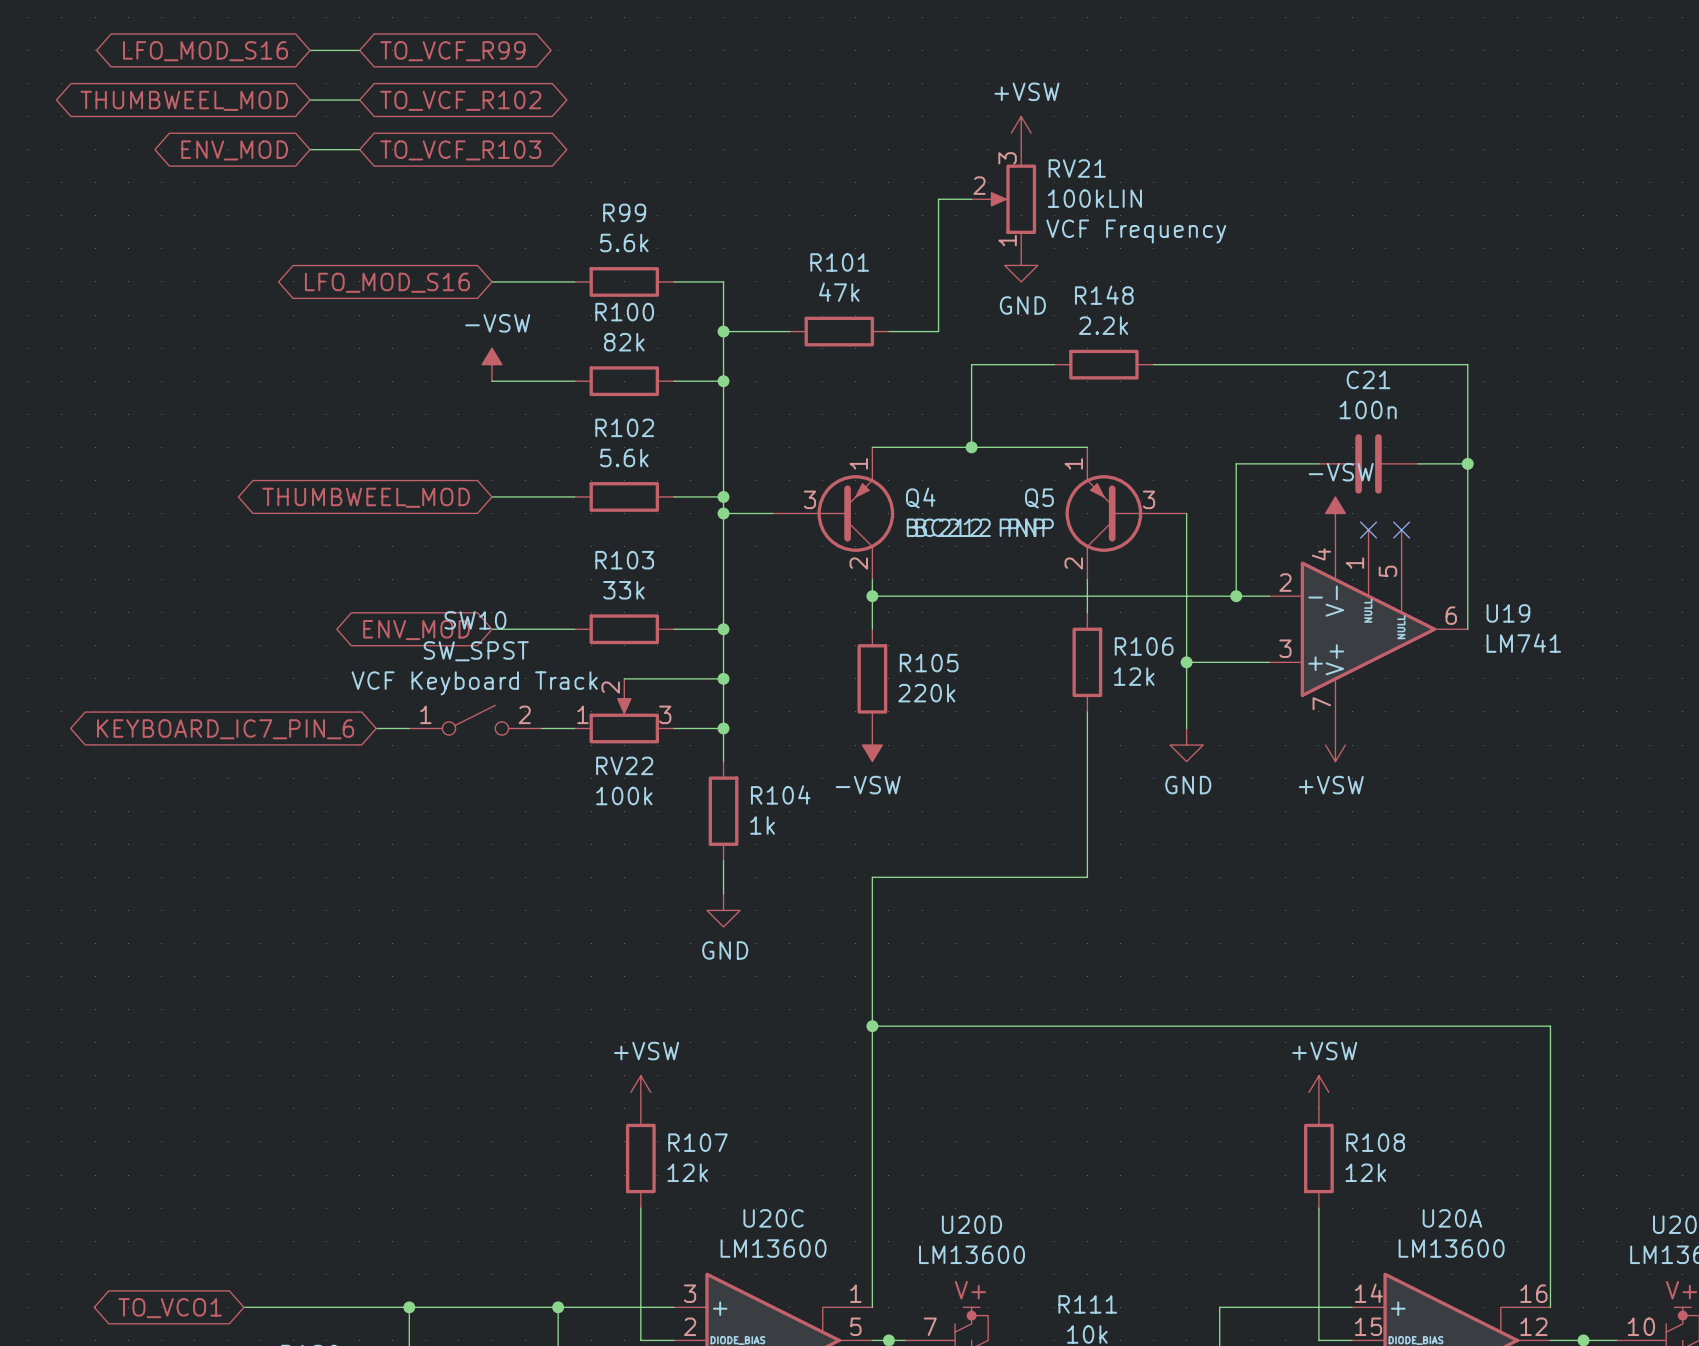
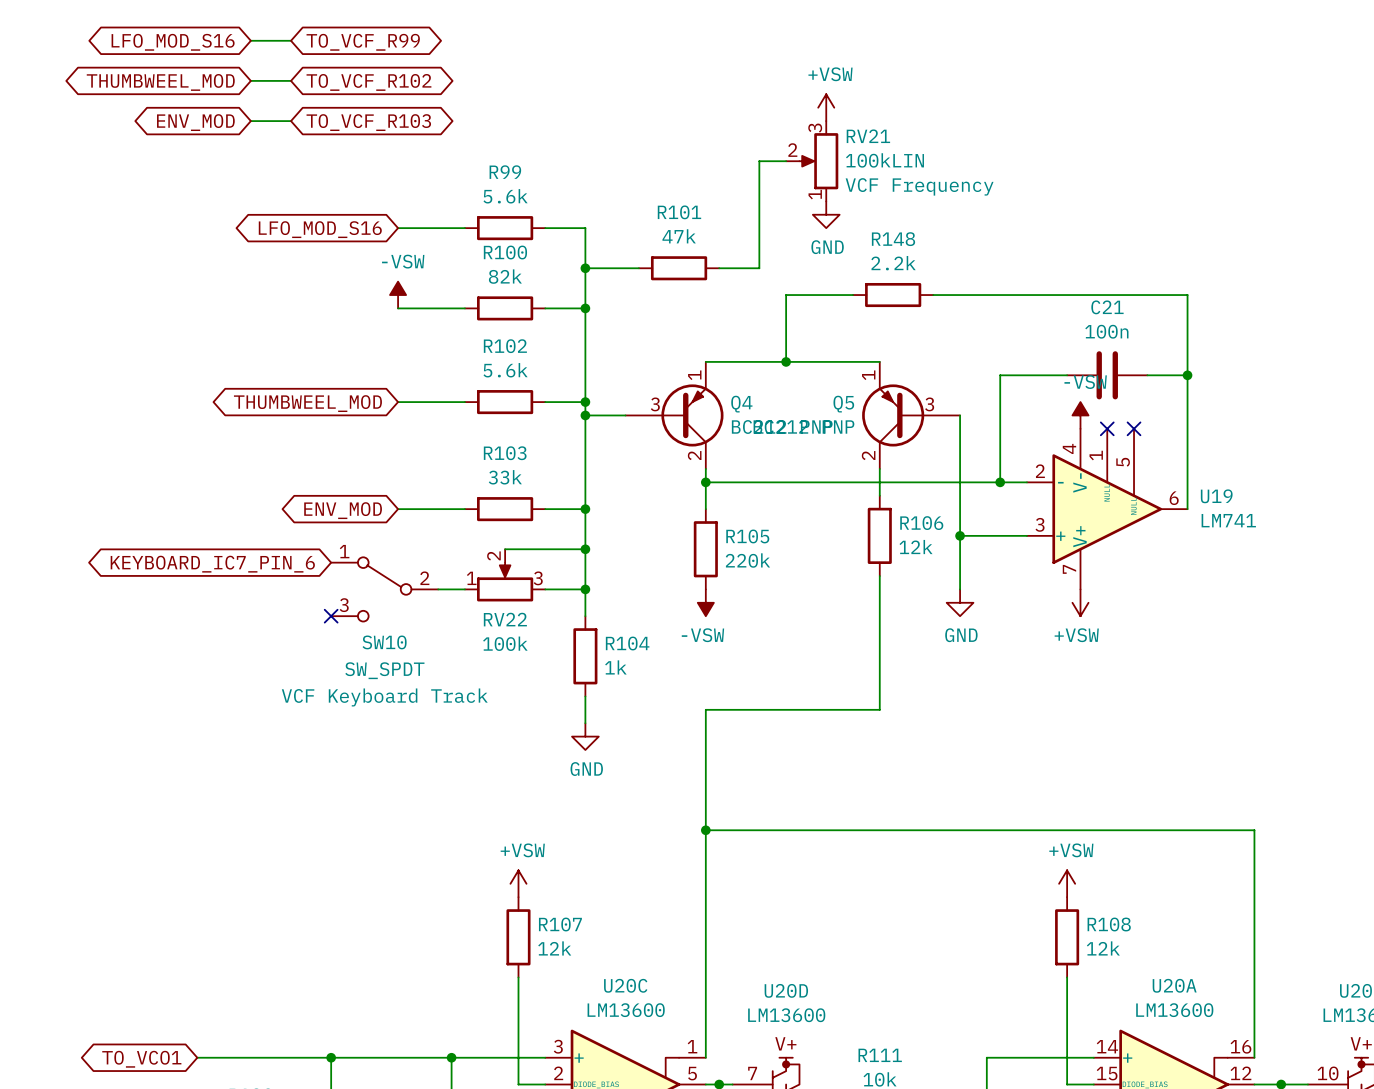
SW10 name position: SW10 (475, 620) -> SW10 (384, 642)
SW10 value: SW_SPST (476, 651) -> SW_SPDT (384, 670)
SW10 text position: VCF Keyboard Track (474, 683) -> VCF Keyboard Track (384, 697)
SW10 symbol: [409, 705, 542, 736] -> [331, 557, 439, 622]
wire: (376, 728) (409, 728) -> none
global label position: KEYBOARD_IC7_PIN_6 (225, 729) -> KEYBOARD_IC7_PIN_6 (212, 564)
no-connect mark: none -> (331, 616)

